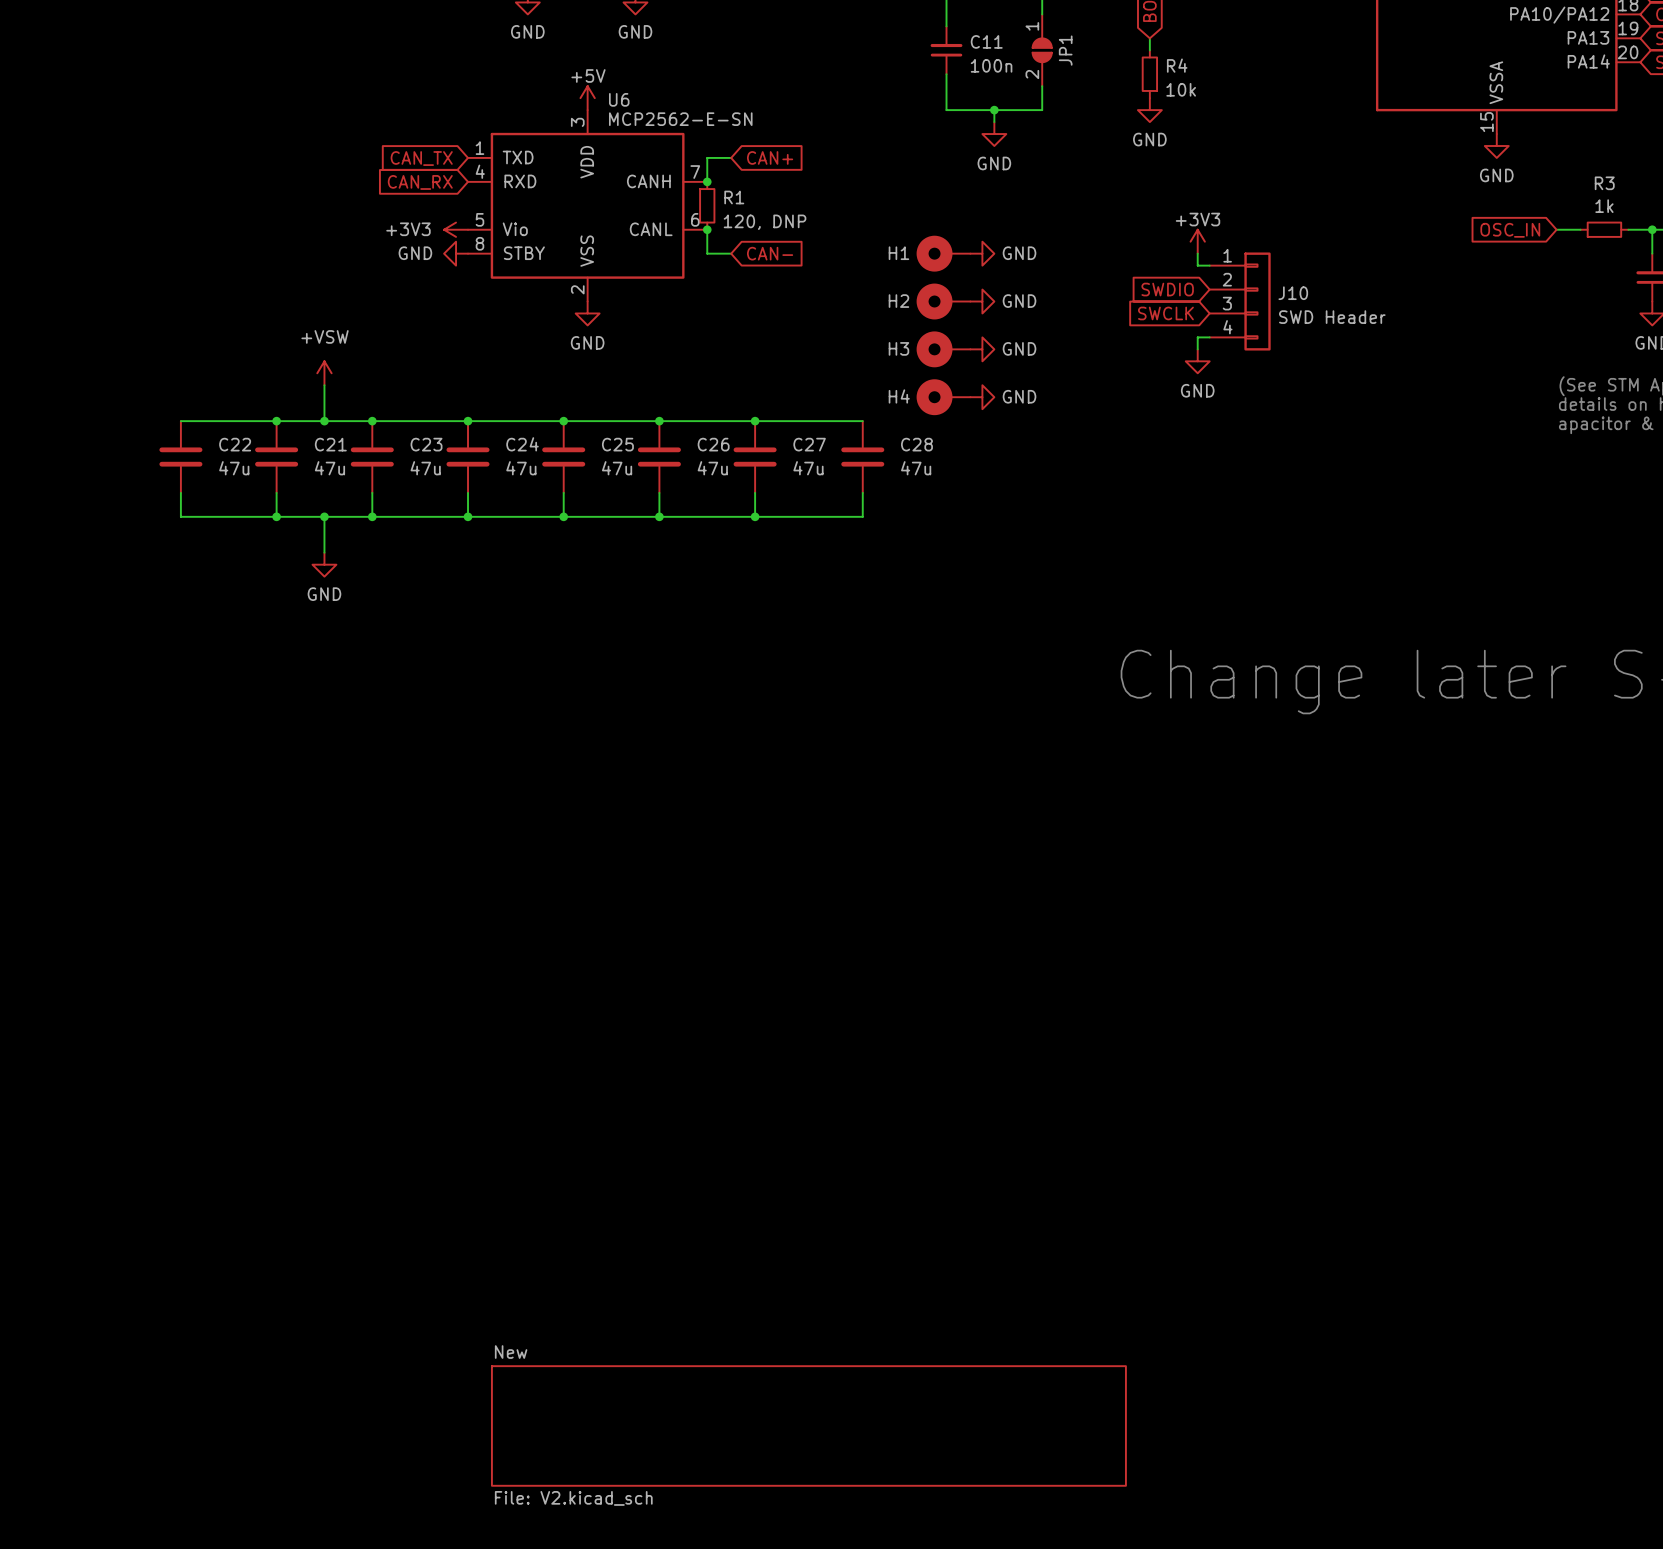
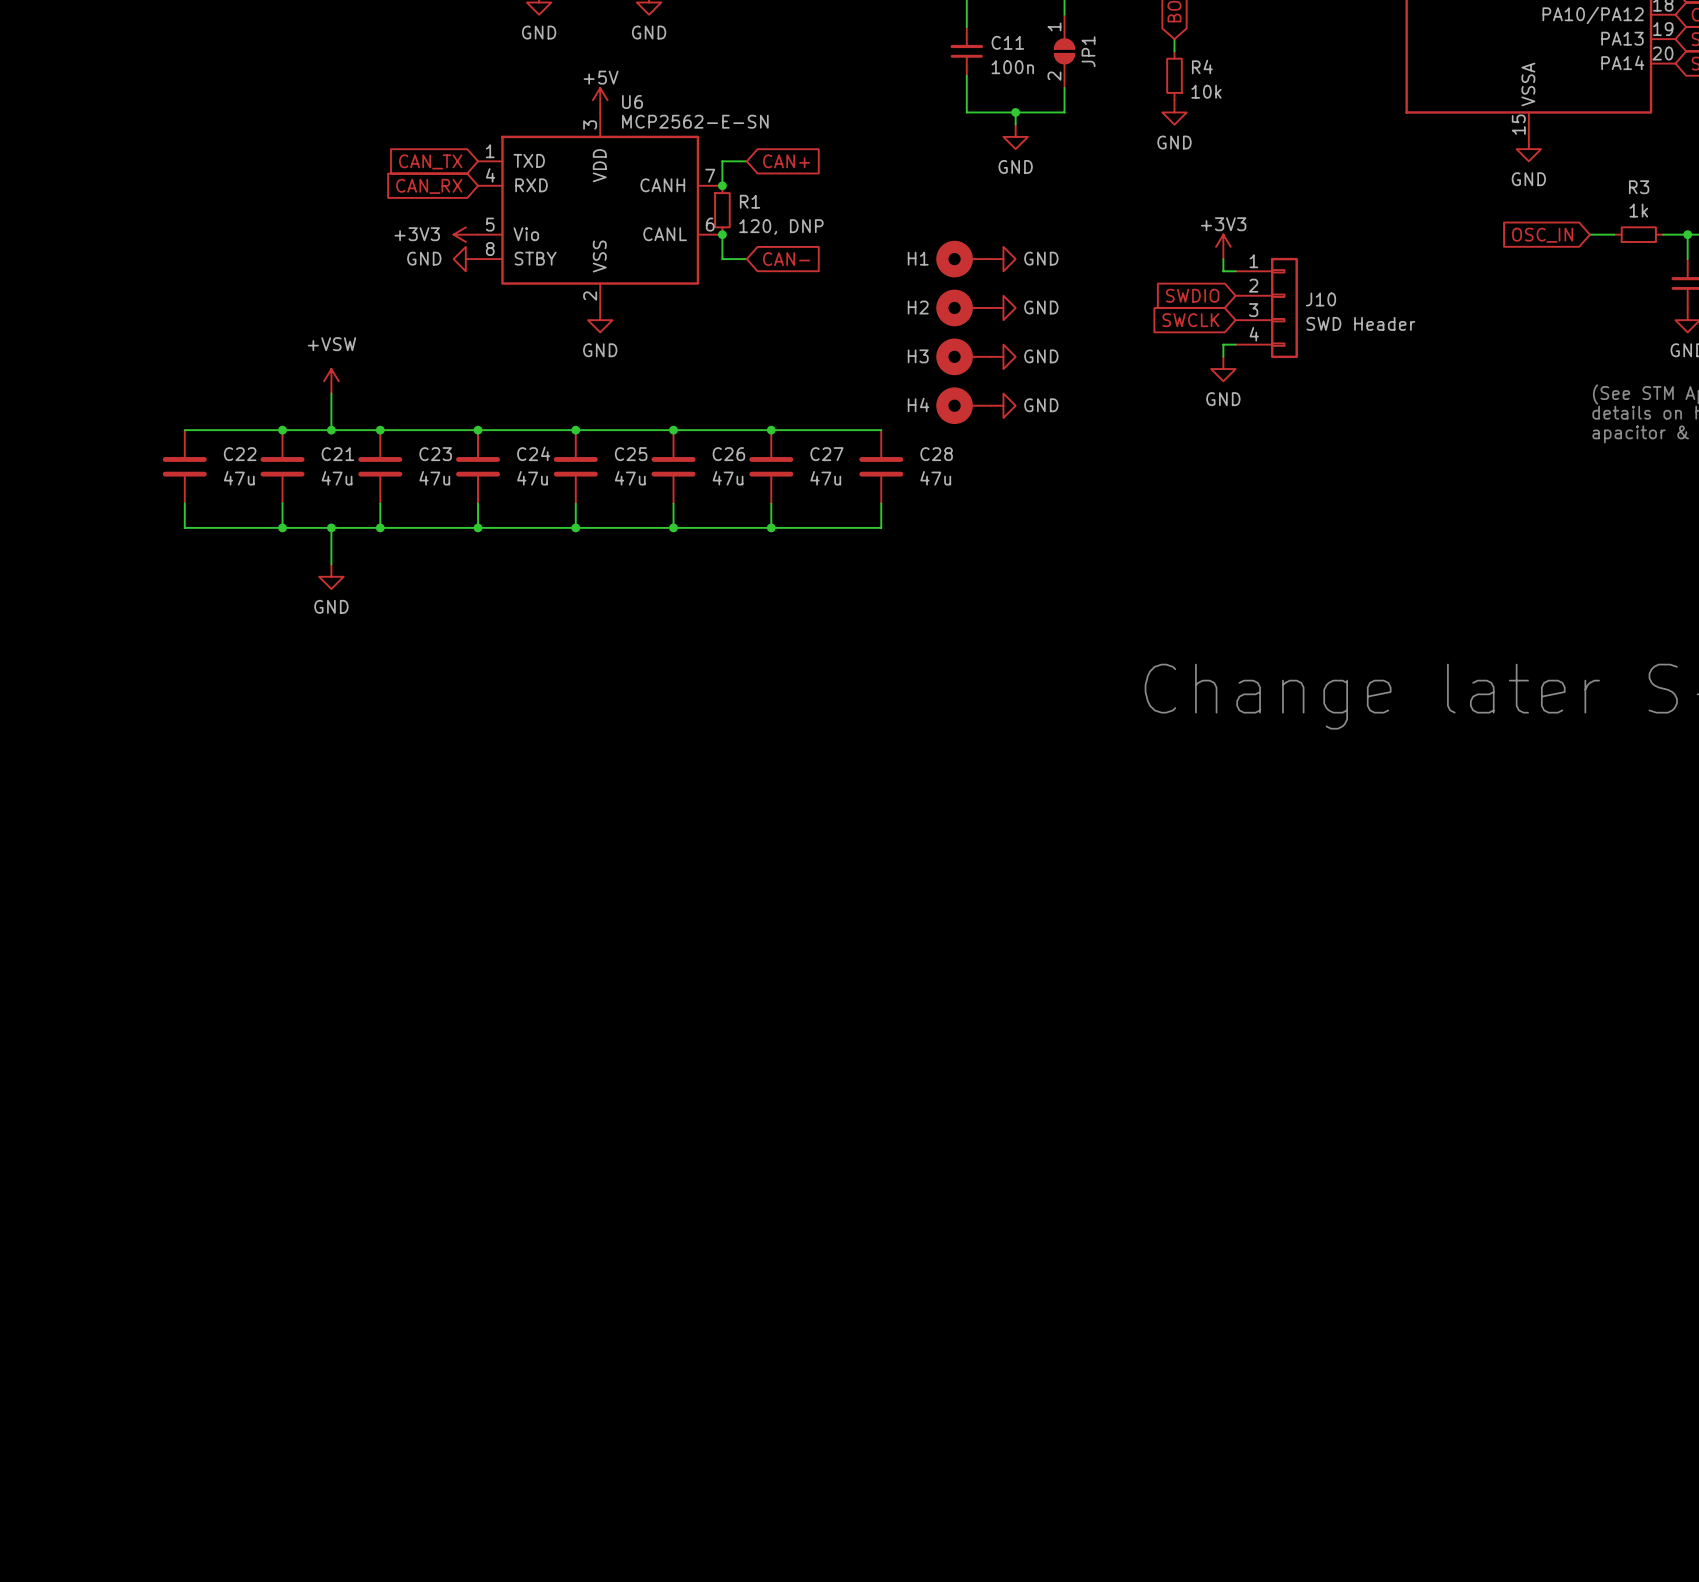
sheet New: File: V2.kicad_sch (808, 1425) -> none

